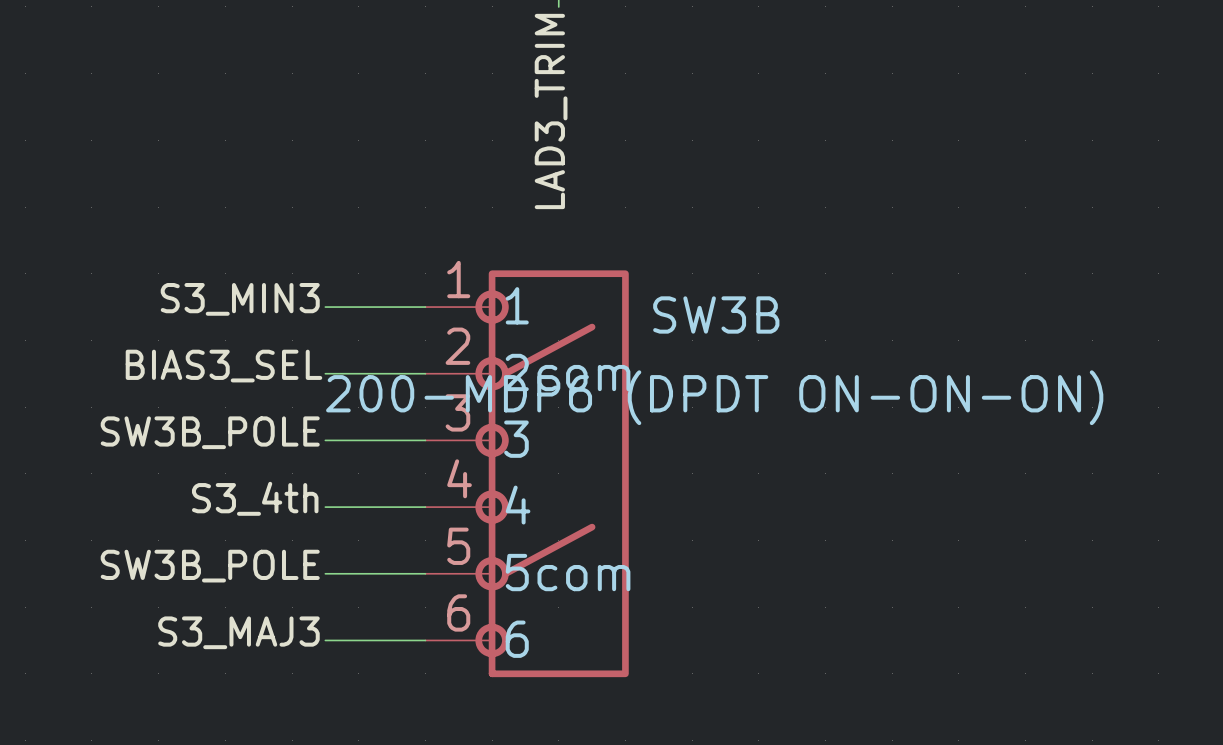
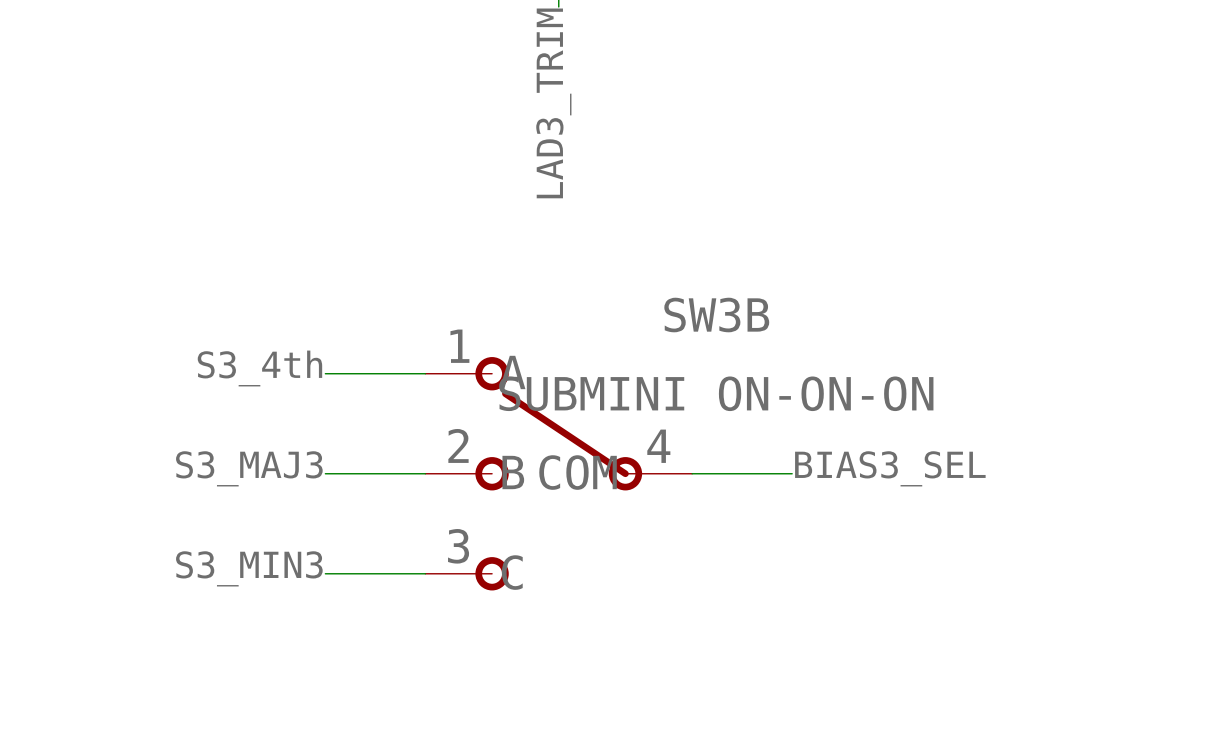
SW3B symbol: [425, 270, 629, 678] -> [425, 357, 693, 591]
label: S3_MIN3 (240, 299) -> none
wire: (325, 307) (425, 307) -> none
label: BIAS3_SEL (223, 366) -> S3_4th (259, 368)
SW3B value: 200-MDP6 (DPDT ON-ON-ON) (714, 397) -> SUBMINI ON-ON-ON (716, 393)
label: SW3B_POLE (210, 432) -> none
wire: (325, 440) (425, 440) -> (325, 473) (425, 473)
label: none -> BIAS3_SEL (890, 468)
label: S3_4th (255, 498) -> none
wire: (325, 507) (425, 507) -> (692, 473) (792, 473)
label: SW3B_POLE (210, 566) -> S3_MIN3 (249, 568)
label position: S3_MAJ3 (238, 632) -> S3_MAJ3 (249, 468)
wire: (325, 640) (425, 640) -> none

